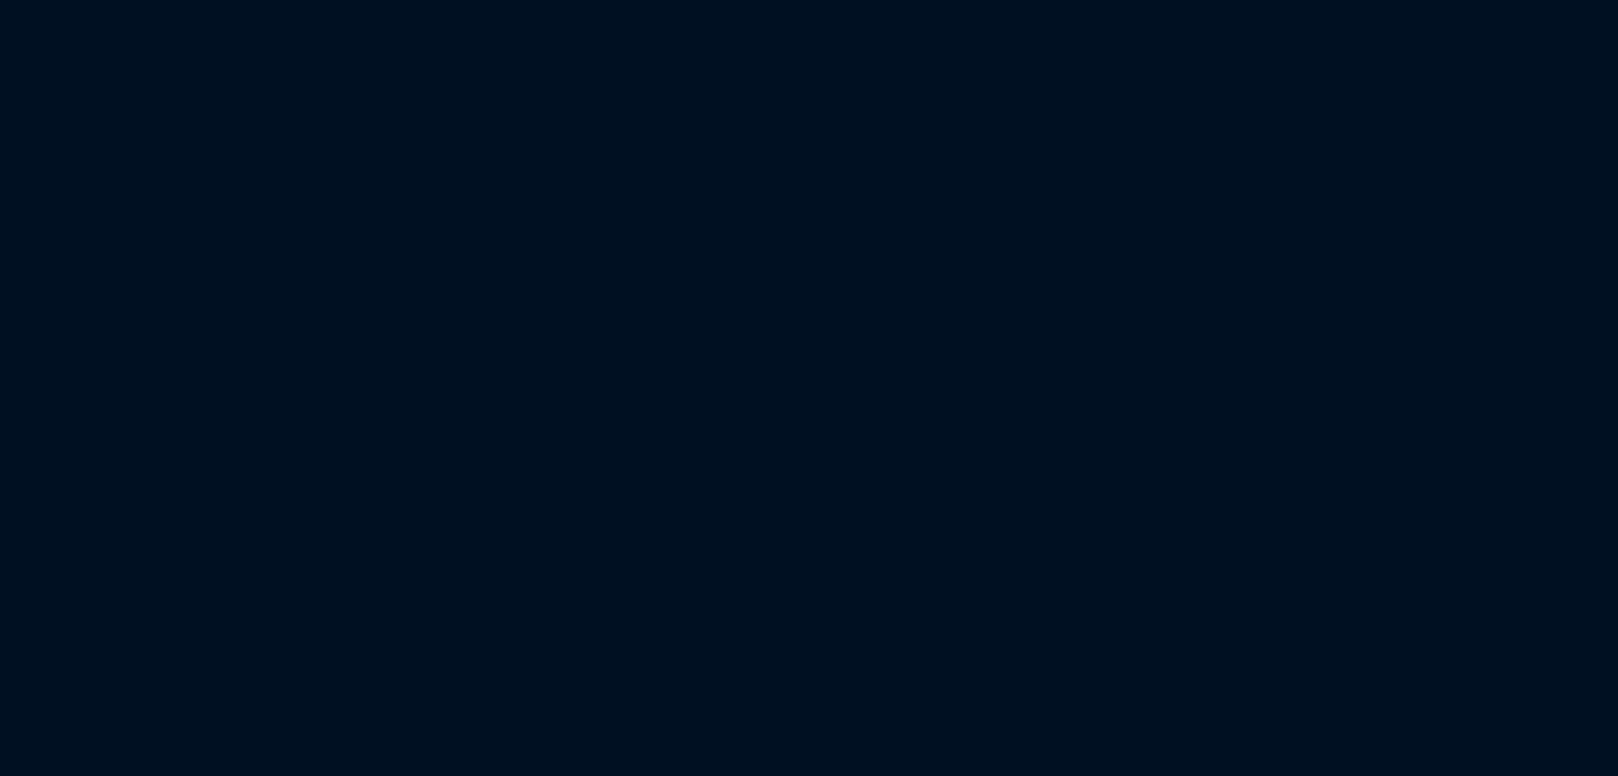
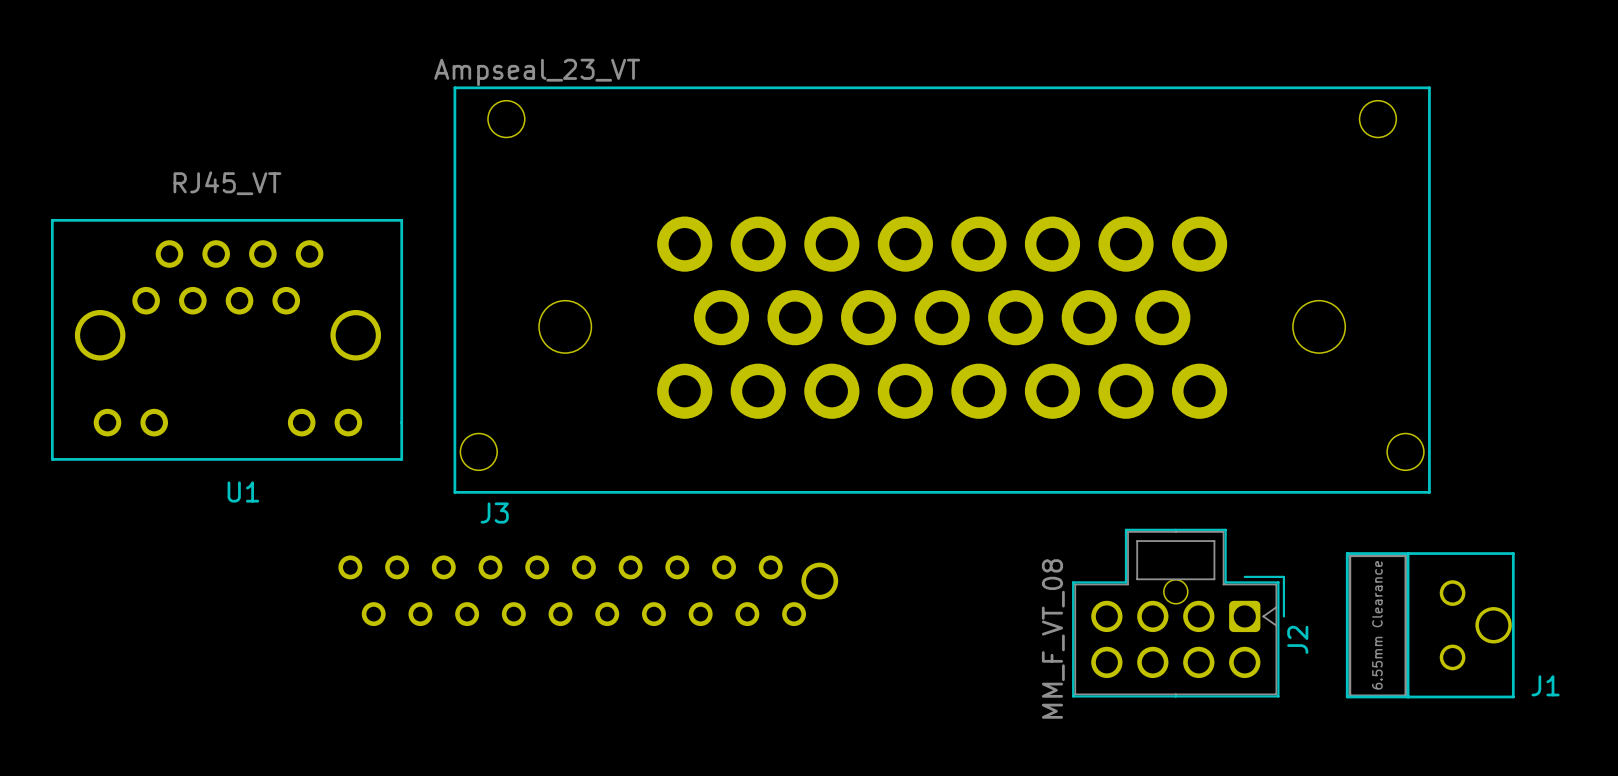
J3: none -> Ampseal_23_VT (942, 290)
U1: none -> RJ45_VT (227, 339)
part: none -> (588, 590)
J2: none -> MM_F_VT_08 (1178, 613)
J1: none -> (1430, 625)

